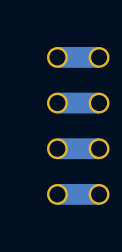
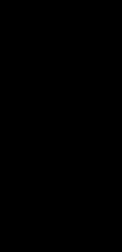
part: (78, 57) -> none
part: (78, 103) -> none
part: (78, 148) -> none
part: (78, 194) -> none

